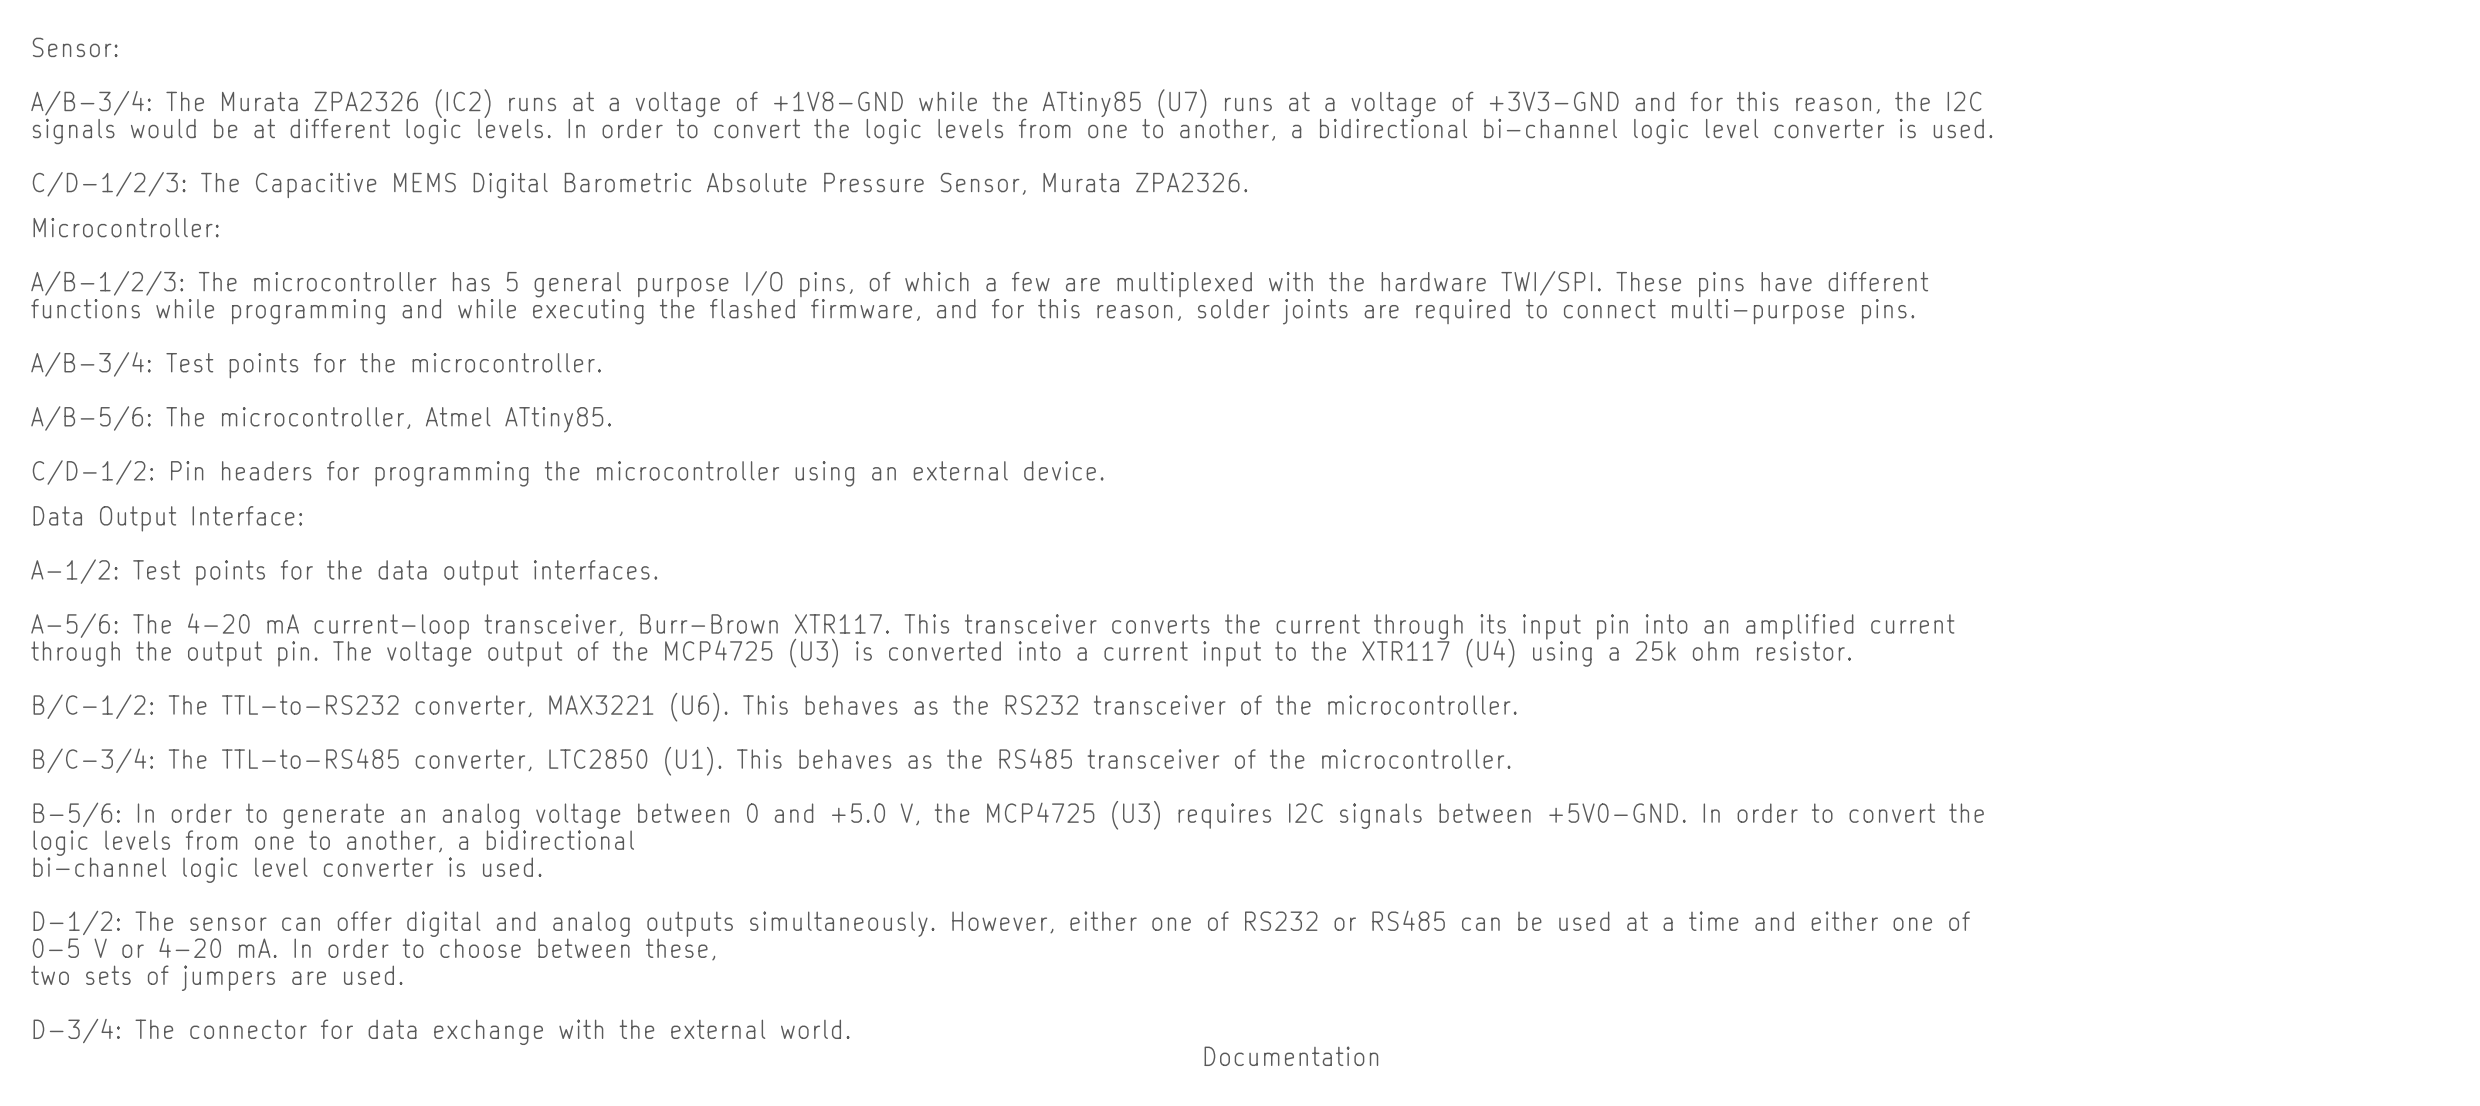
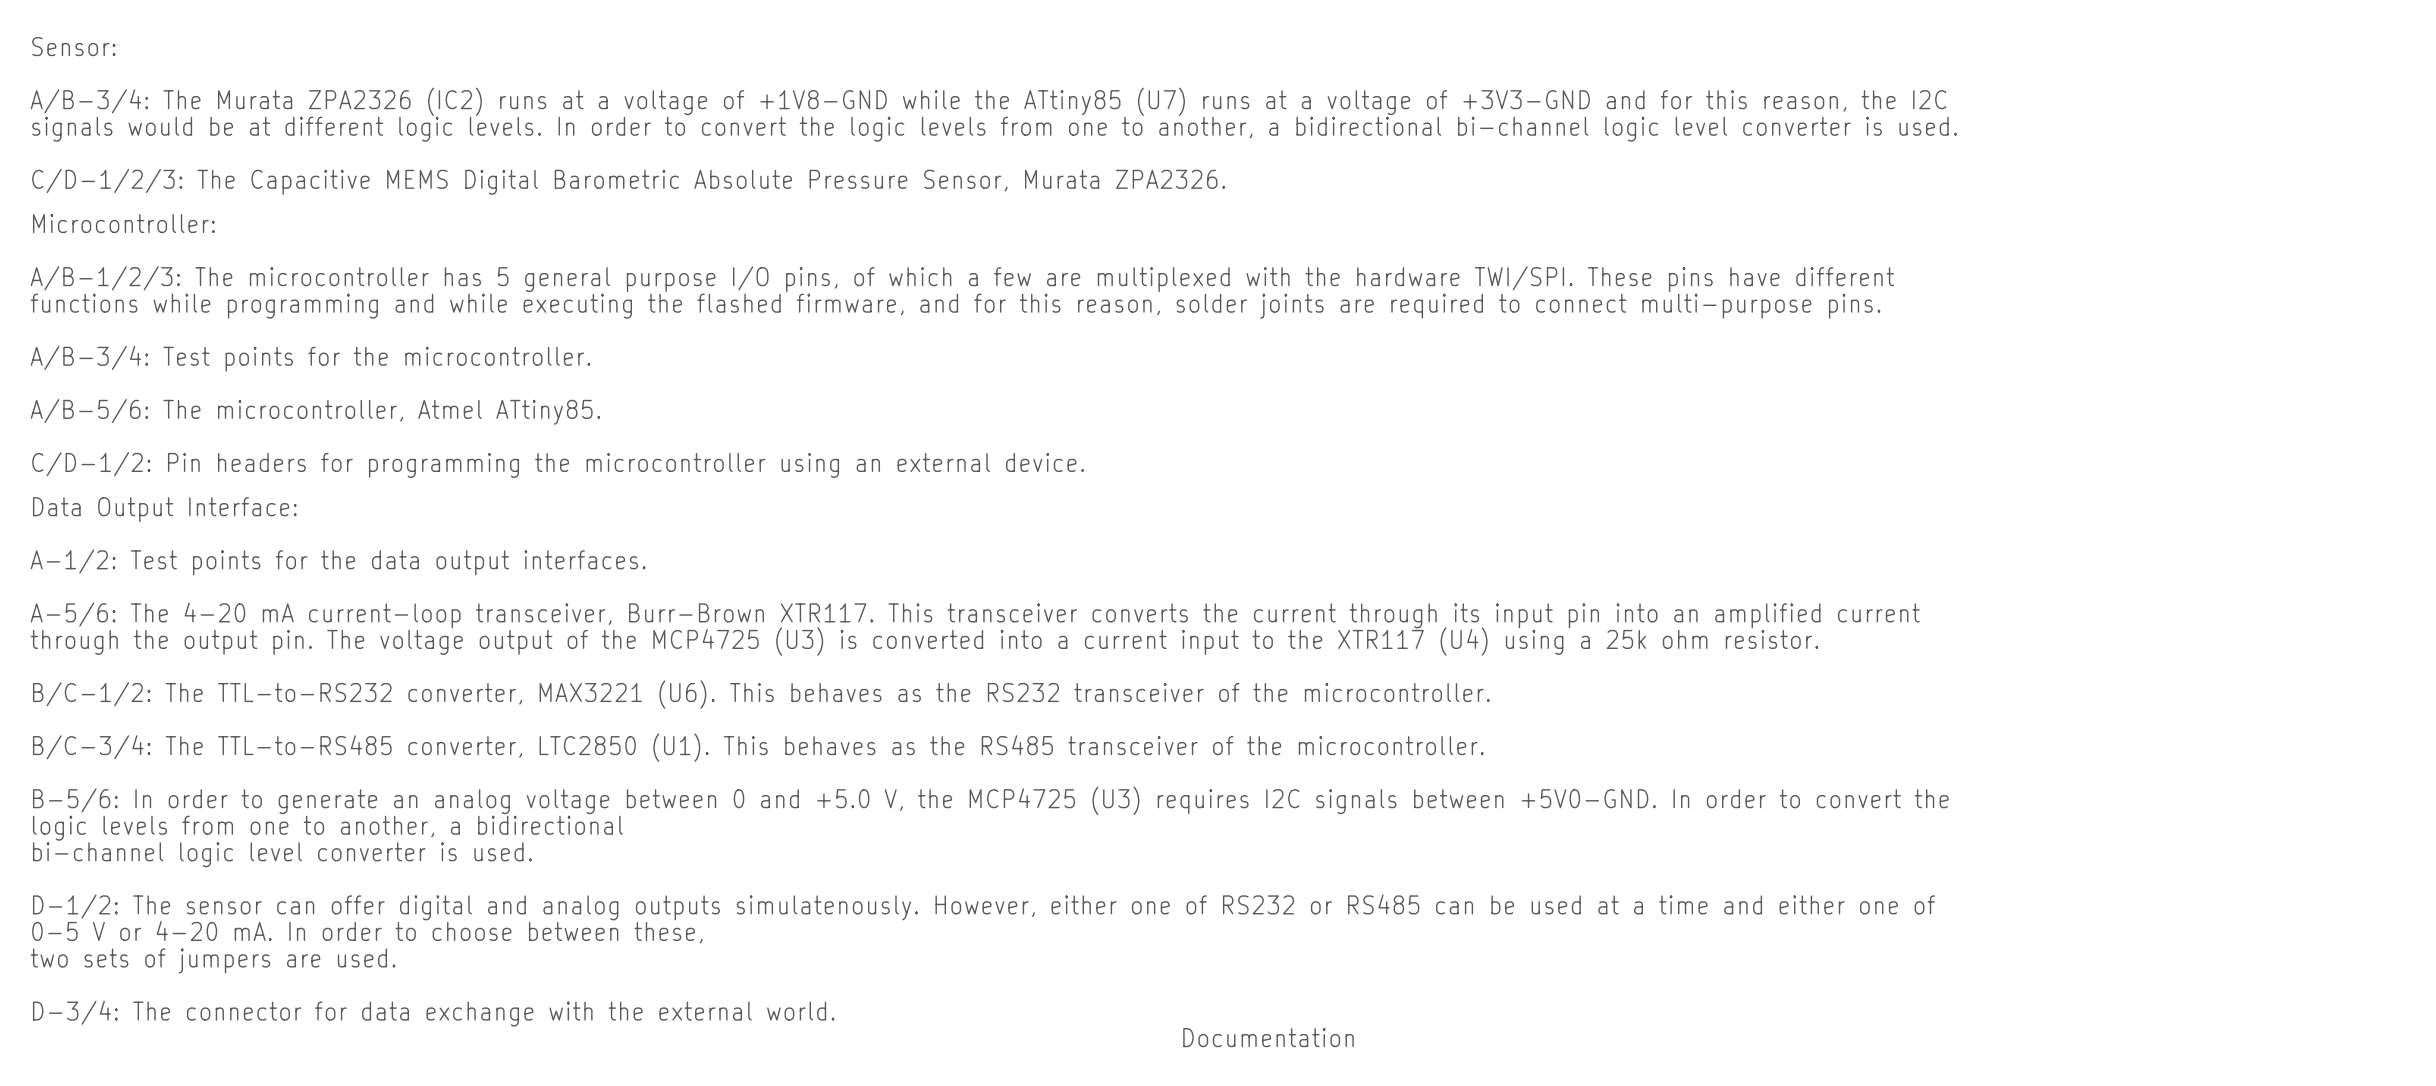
text: D-1/2: The sensor can offer digital and analog outputs simultaneously. However, either one of RS232 or RS485 can be used at a time and either one of (1001, 923) -> D-1/2: The sensor can offer digital and analog outputs simulatenously. However, either one of RS232 or RS485 can be used at a time and either one of (983, 907)

